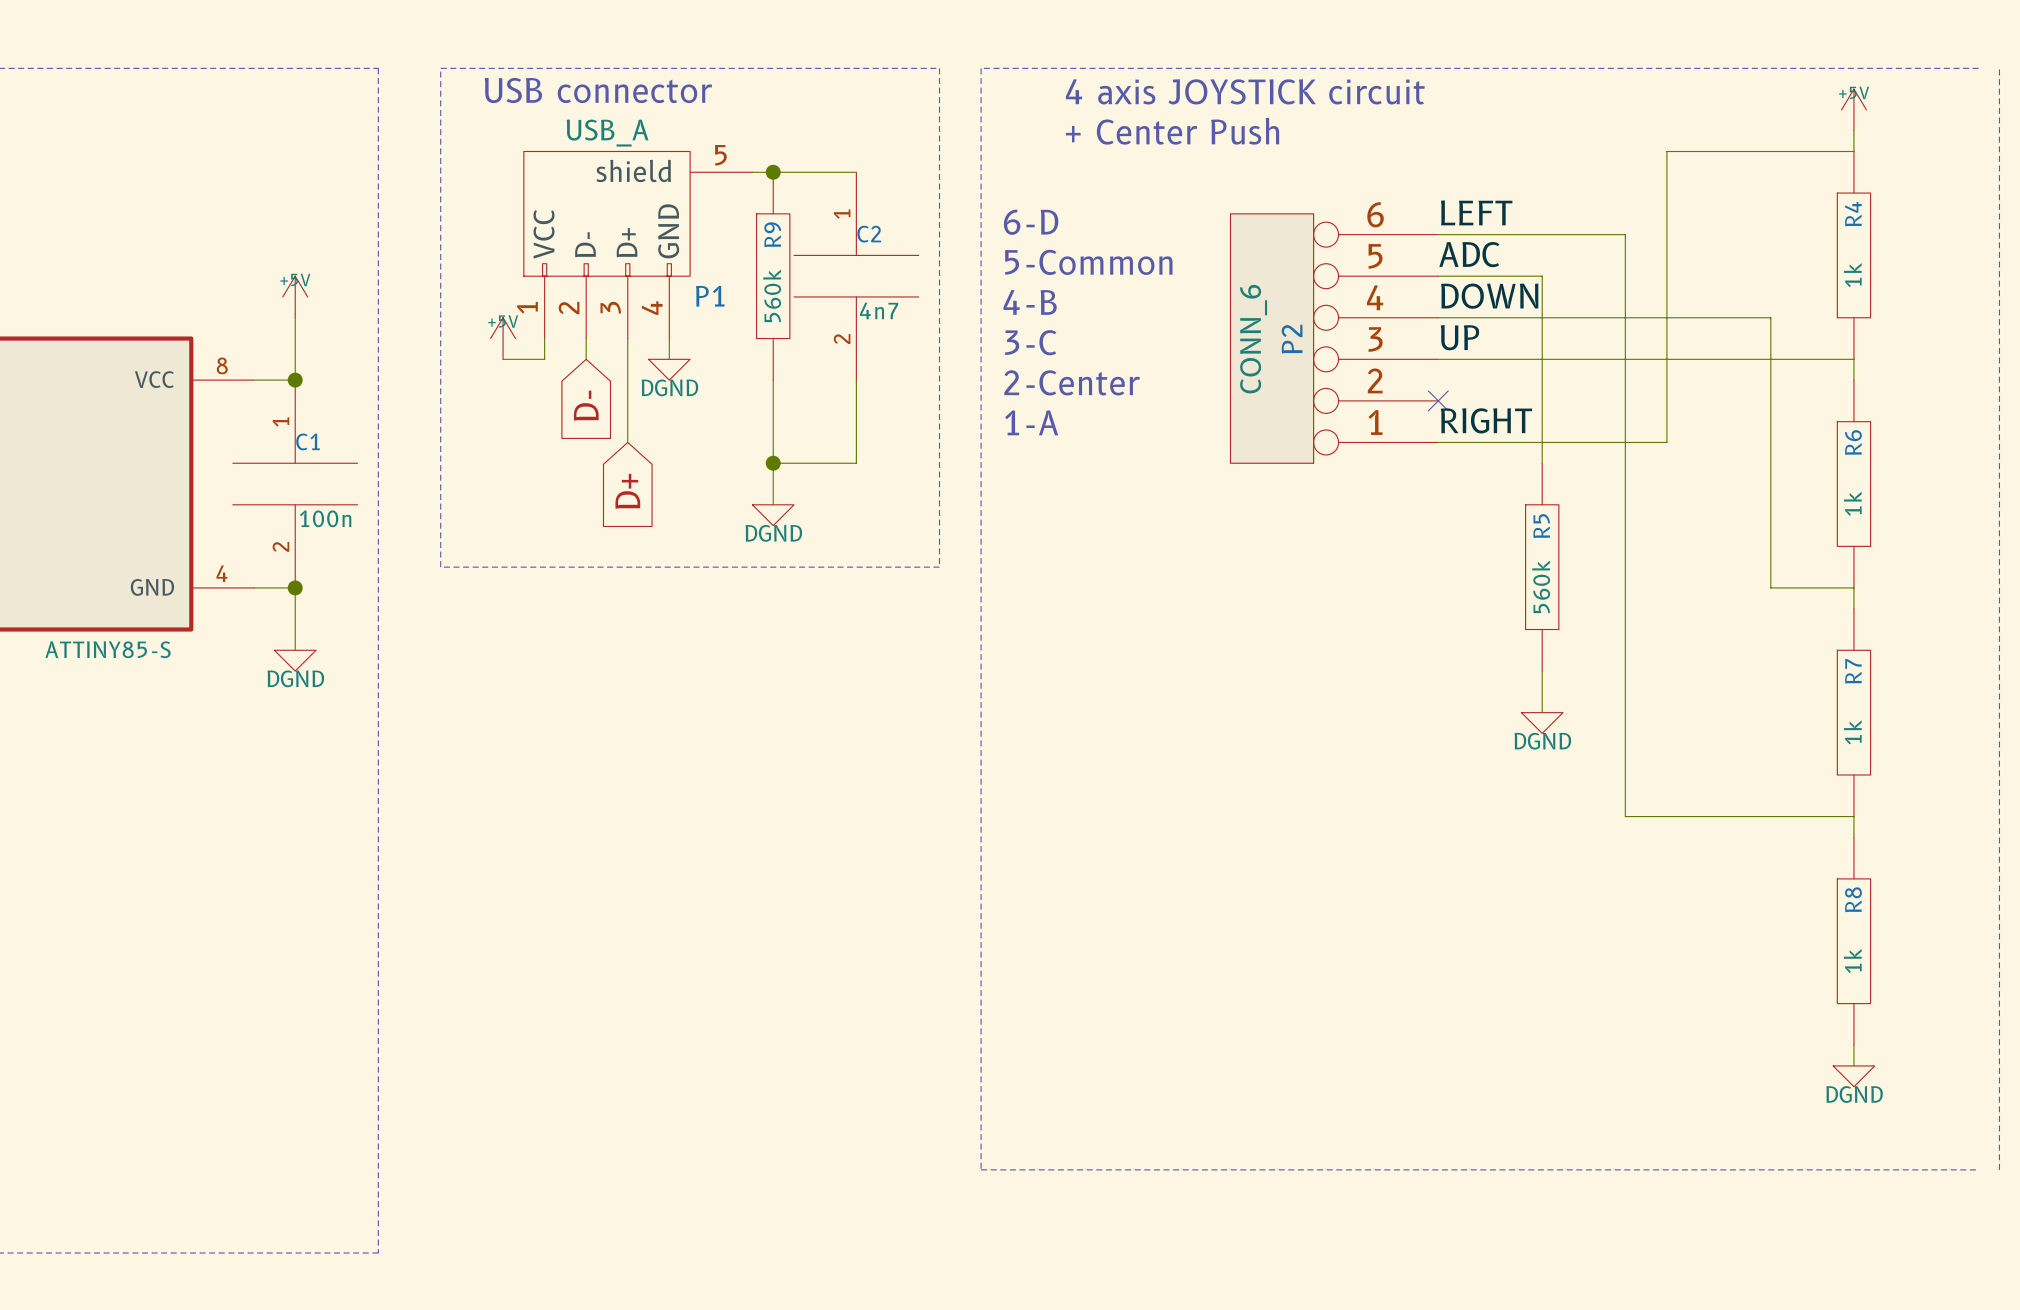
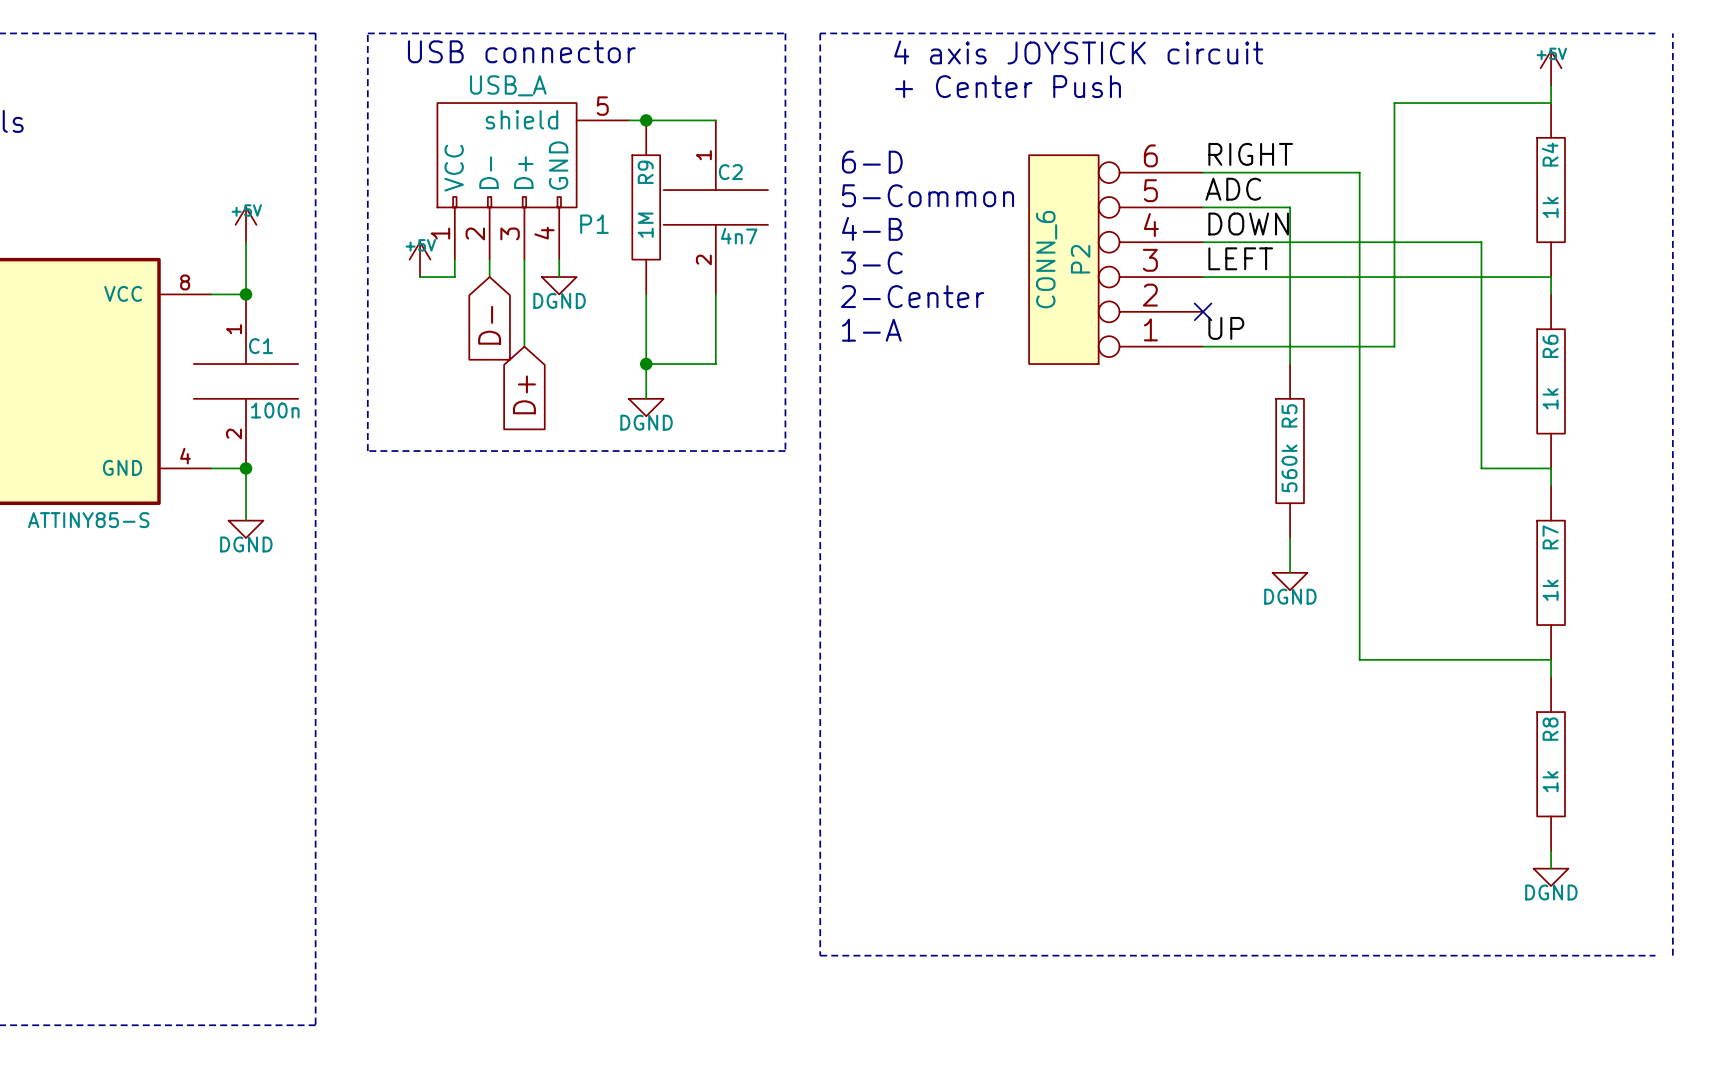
label: LEFT (1476, 212) -> RIGHT (1250, 154)
R9 value: 560k (772, 295) -> 1M (645, 225)
label: UP (1459, 337) -> LEFT (1240, 258)
label: RIGHT (1486, 420) -> UP (1226, 328)

